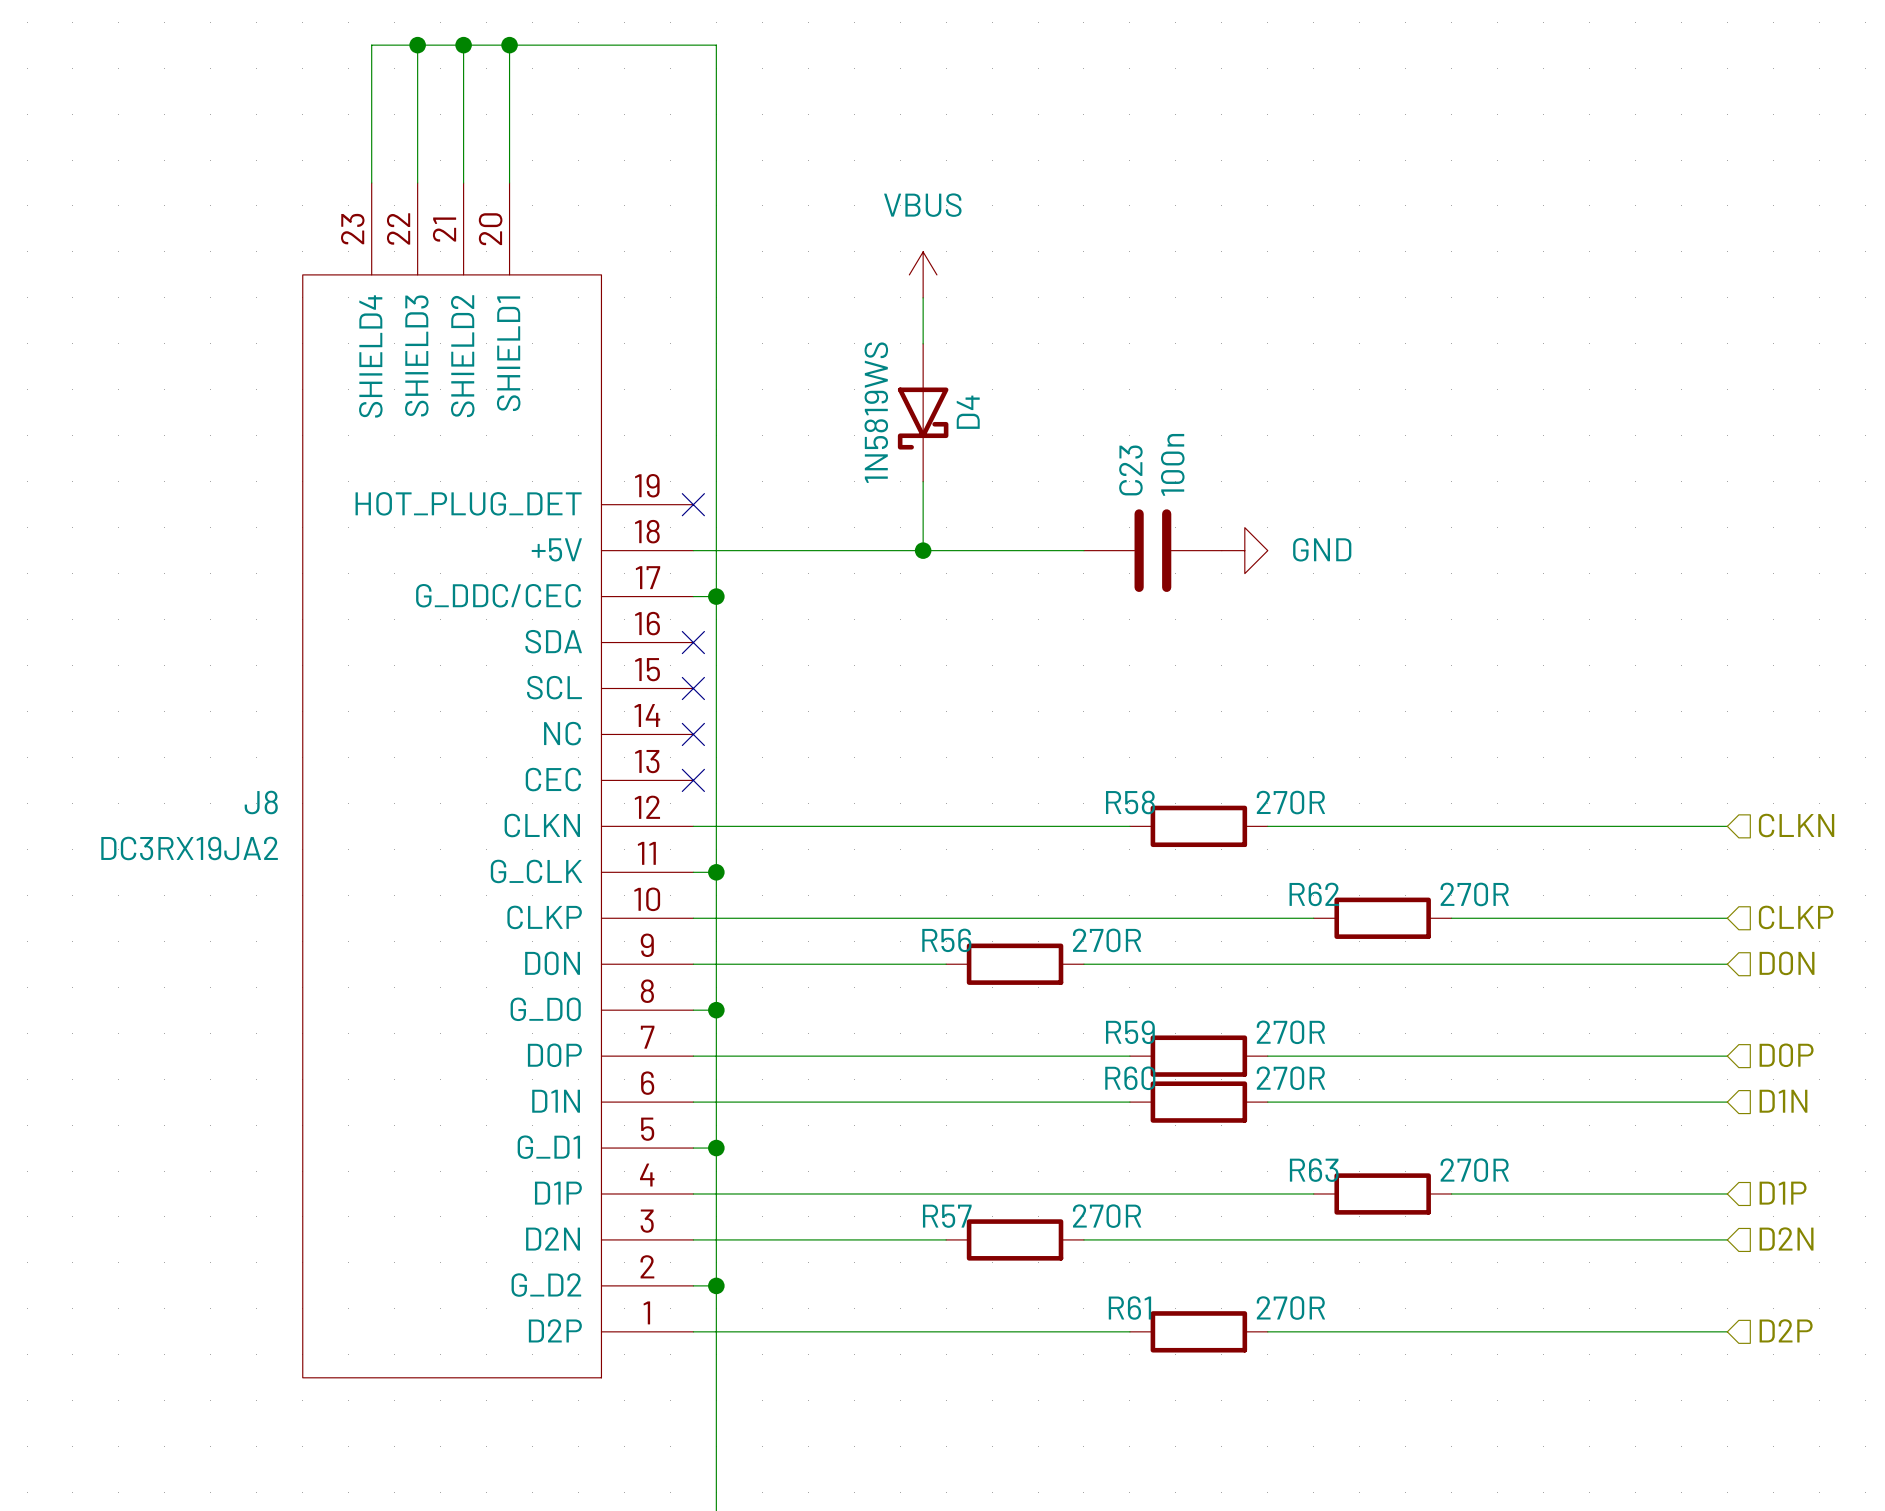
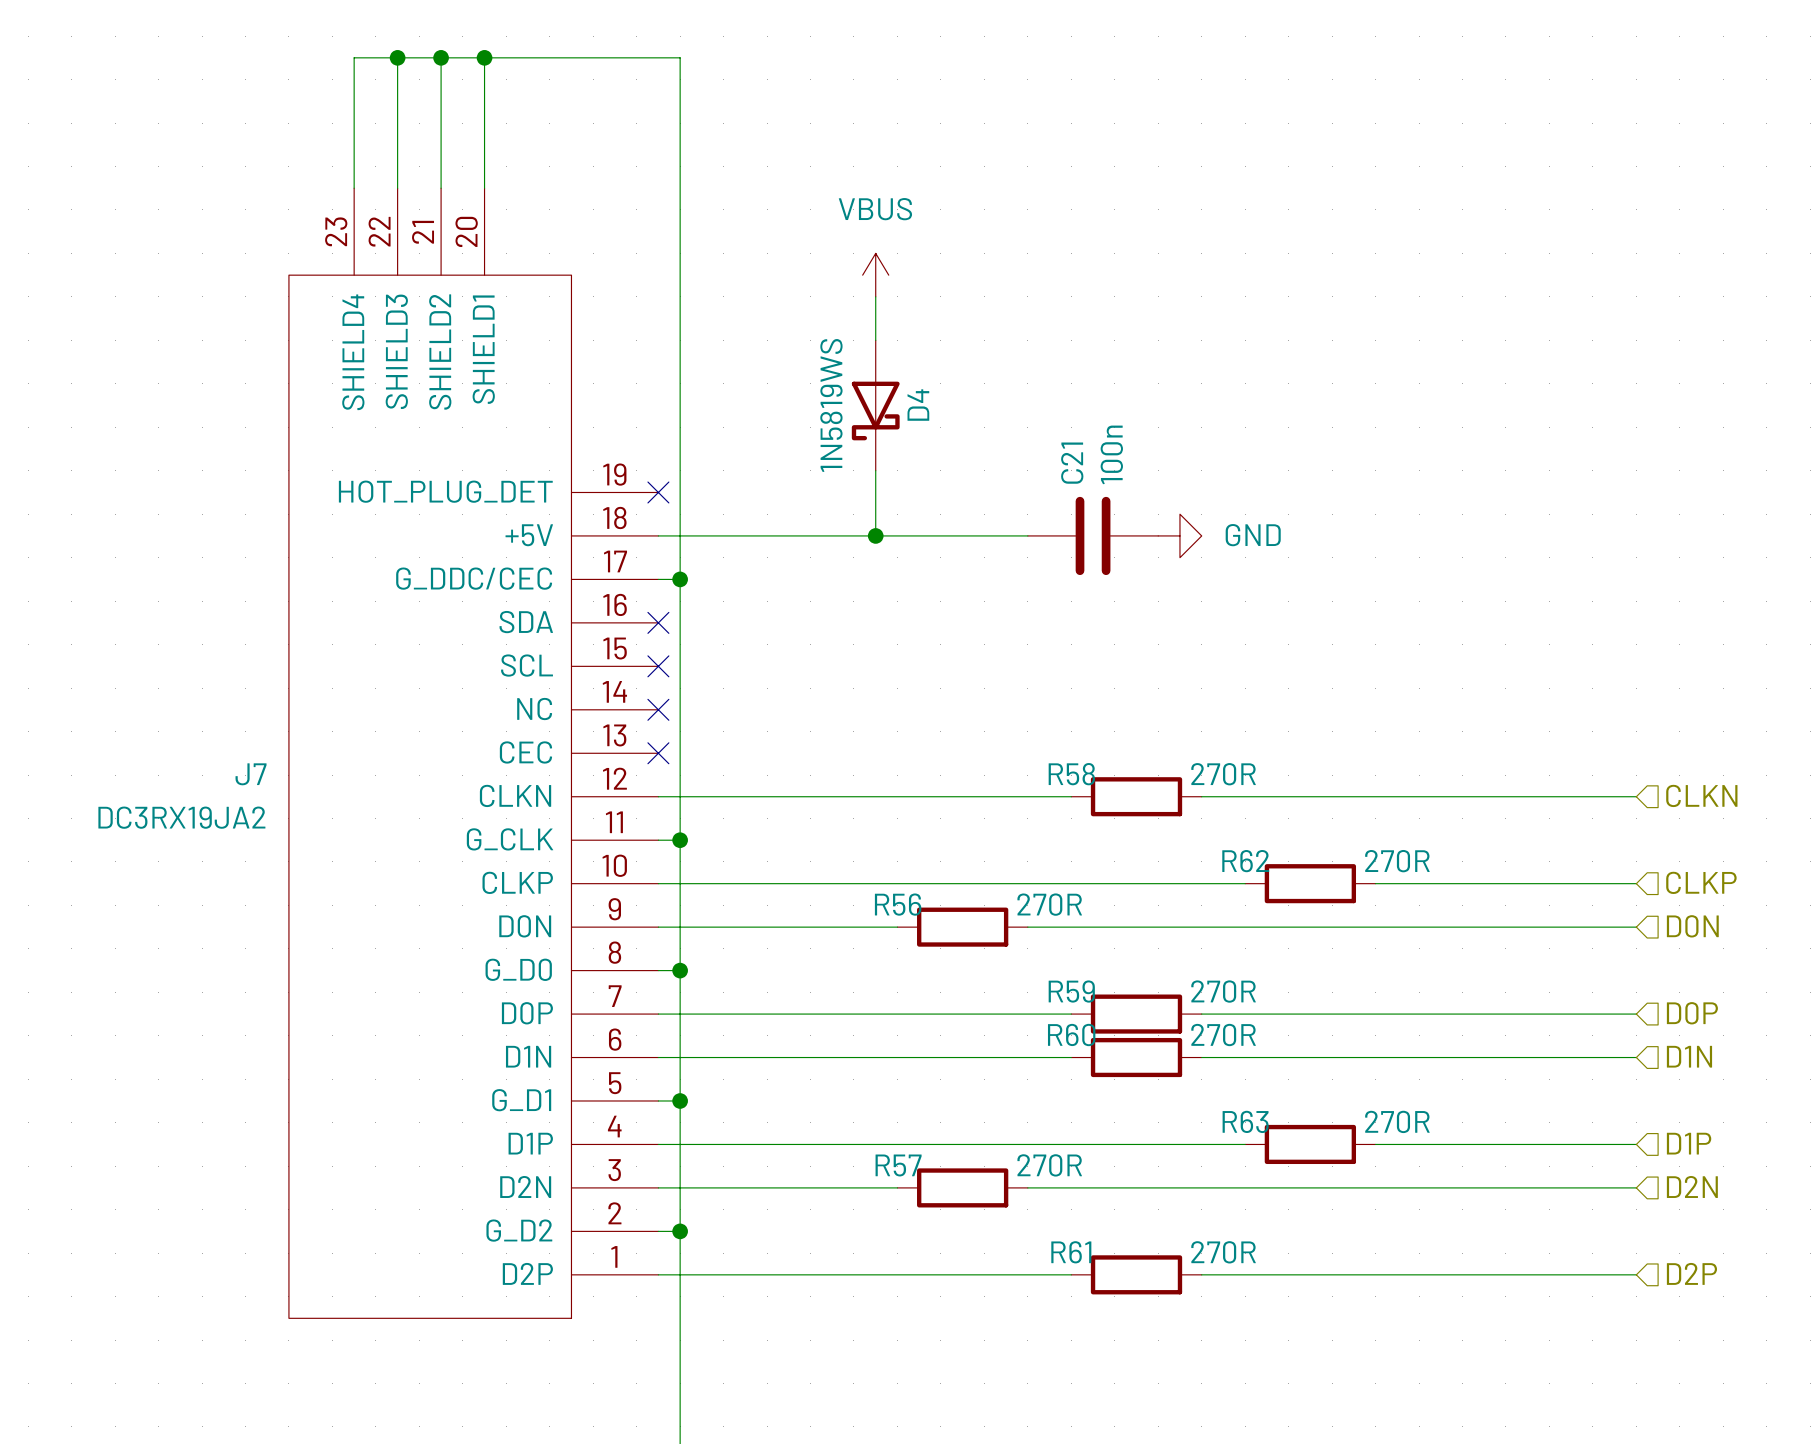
C23 name: C23 (1130, 470) -> C21 (1072, 463)
J8 name: J8 (261, 802) -> J7 (251, 774)

